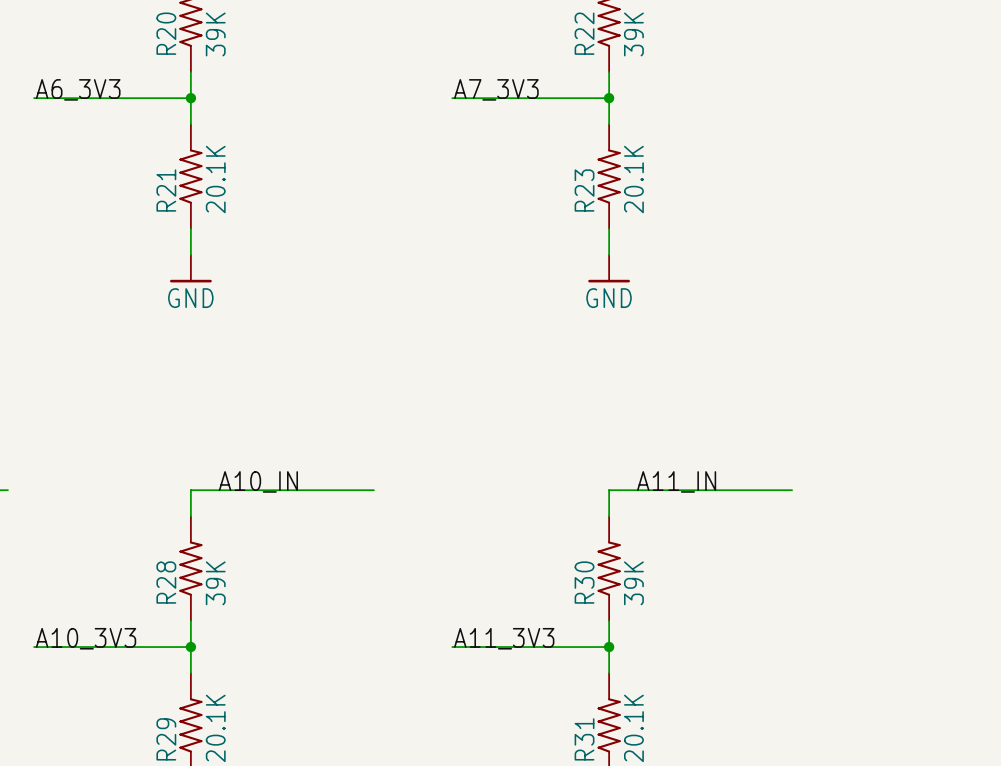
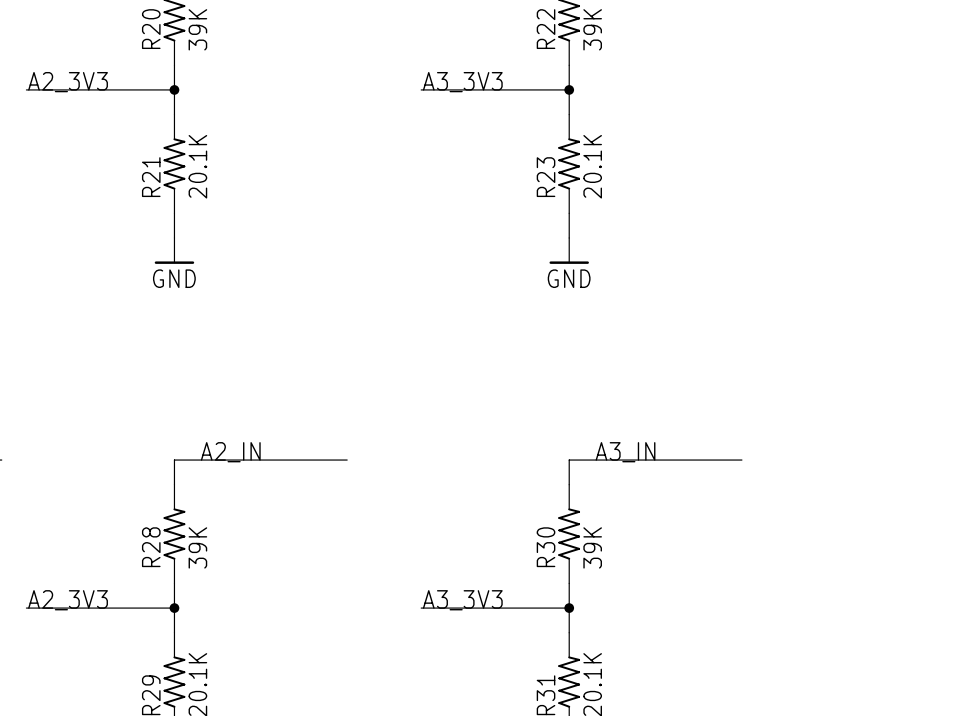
label: A6_3V3 (78, 89) -> A2_3V3 (68, 82)
label: A7_3V3 (496, 89) -> A3_3V3 (462, 82)
label: A10_IN (258, 481) -> A2_IN (230, 452)
label: A11_IN (676, 481) -> A3_IN (625, 452)
label: A10_3V3 (86, 638) -> A2_3V3 (68, 600)
label: A11_3V3 (504, 638) -> A3_3V3 (462, 600)

